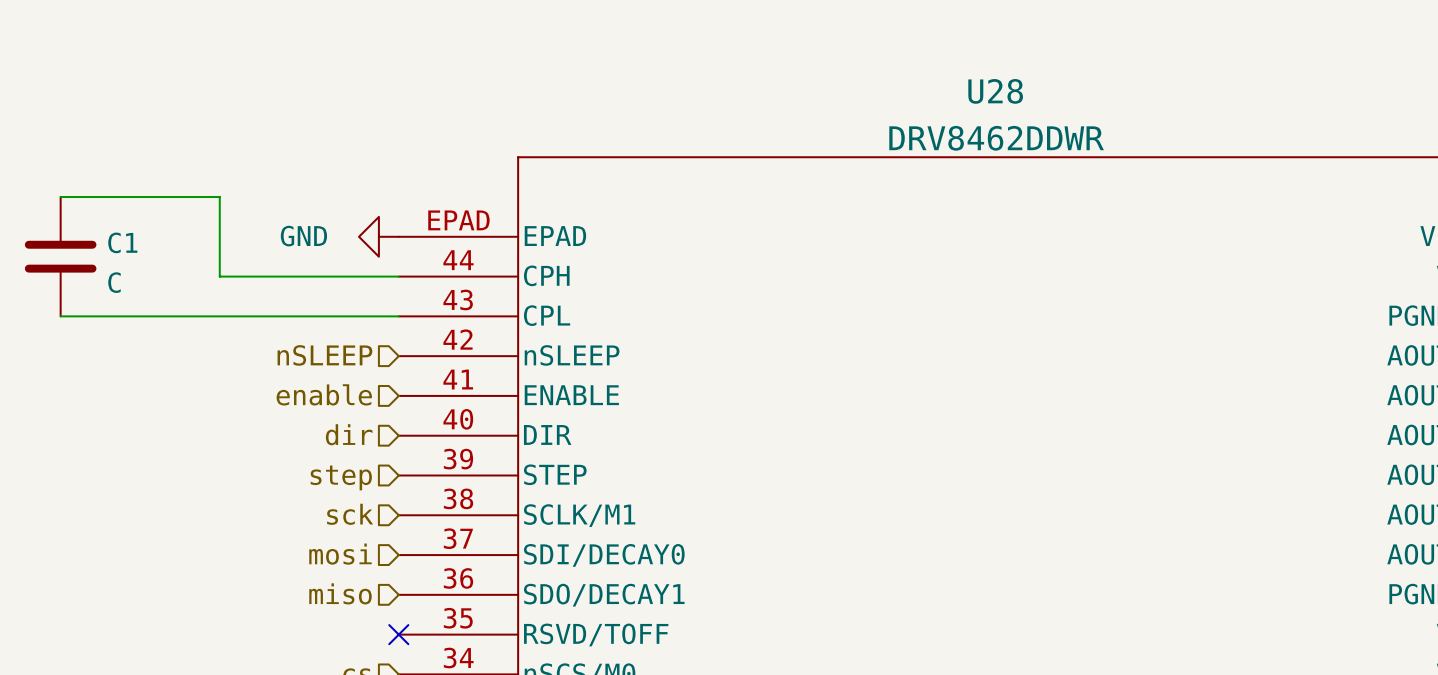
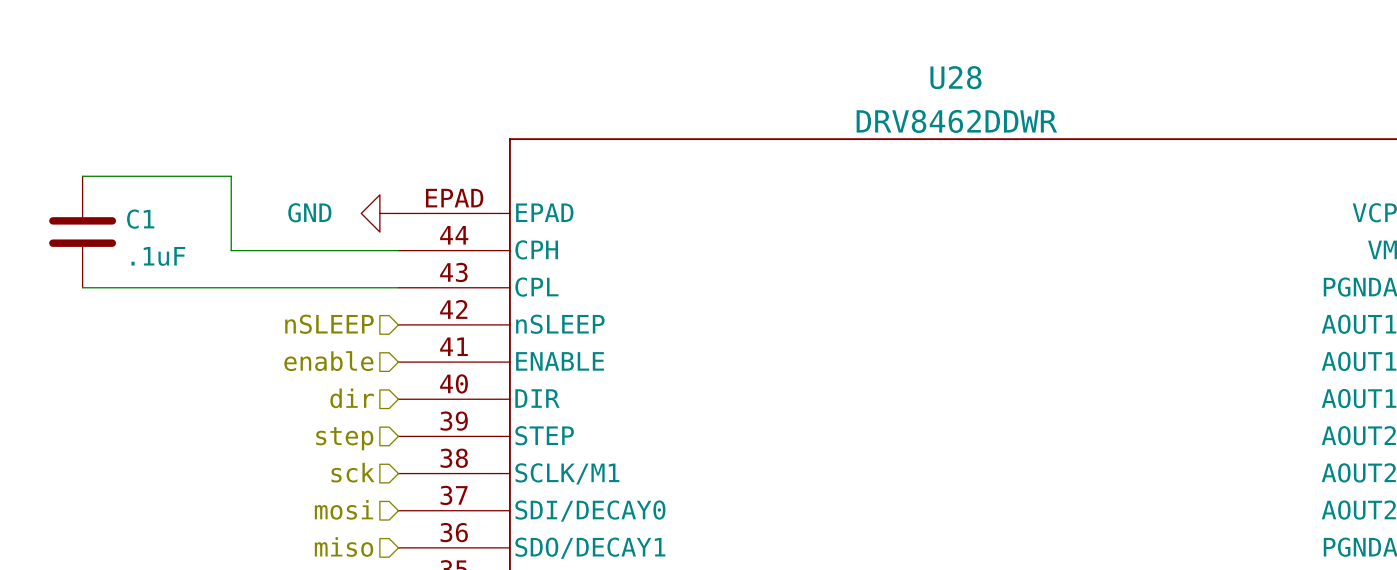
C1 value: C (114, 282) -> .1uF (158, 256)

